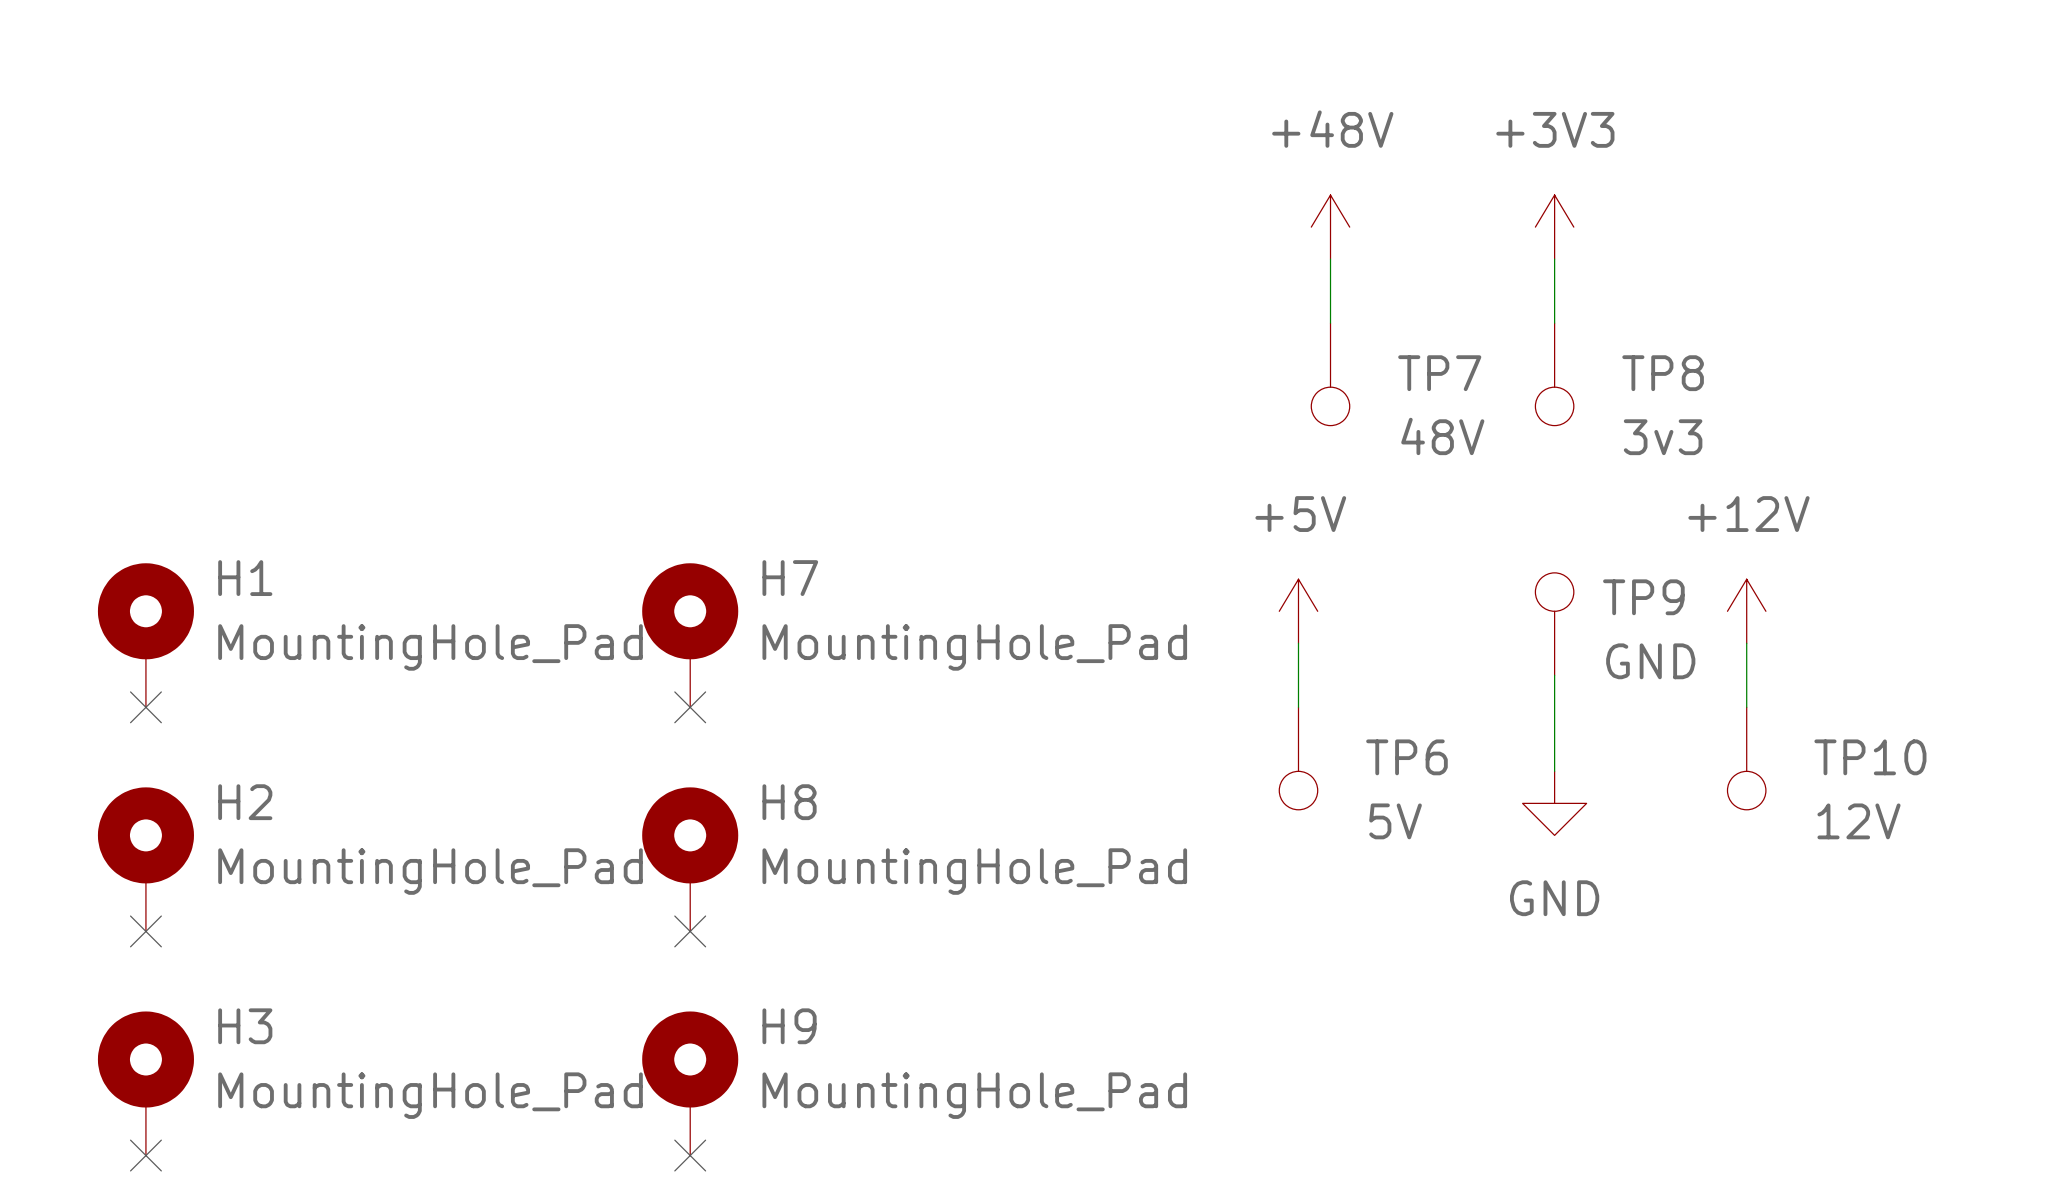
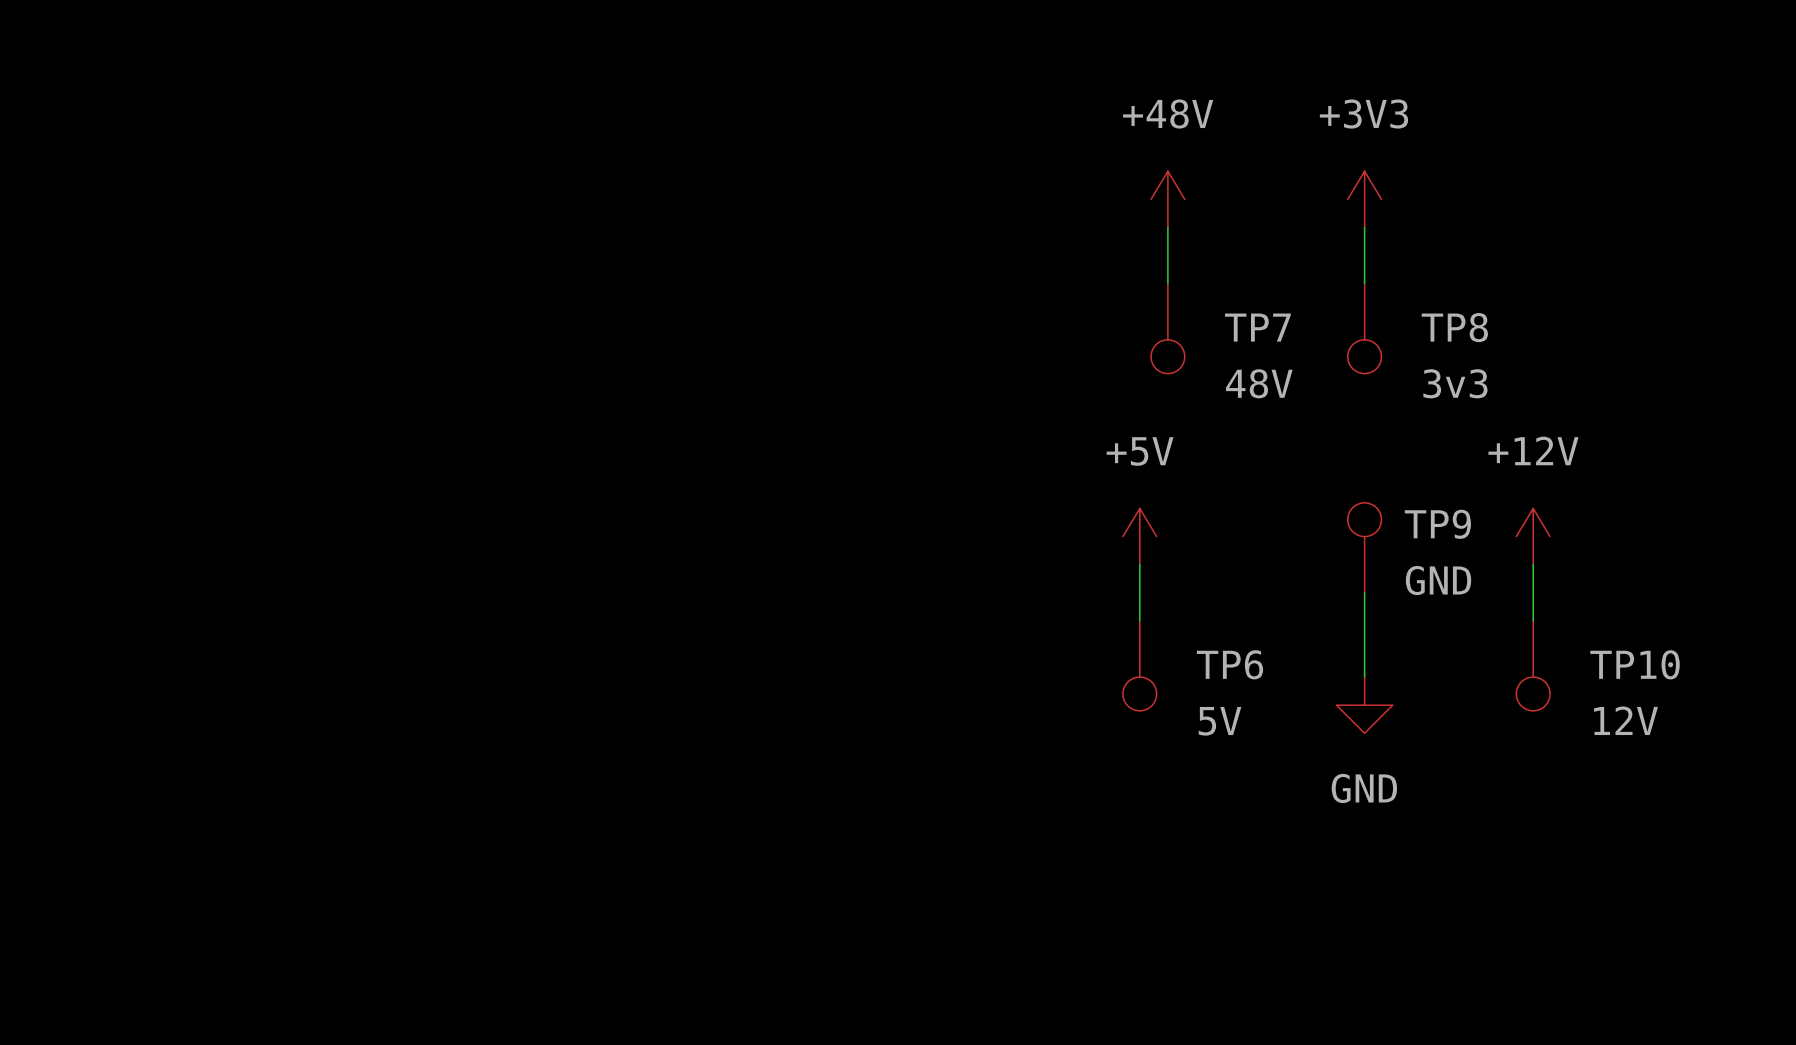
H1: MountingHole_Pad (145, 635) -> none
H7: MountingHole_Pad (690, 635) -> none
no-connect mark: (145, 707) -> none
no-connect mark: (690, 707) -> none
H2: MountingHole_Pad (145, 859) -> none
H8: MountingHole_Pad (690, 859) -> none
no-connect mark: (145, 931) -> none
no-connect mark: (690, 931) -> none
H3: MountingHole_Pad (145, 1083) -> none
H9: MountingHole_Pad (690, 1083) -> none
no-connect mark: (145, 1155) -> none
no-connect mark: (690, 1155) -> none

